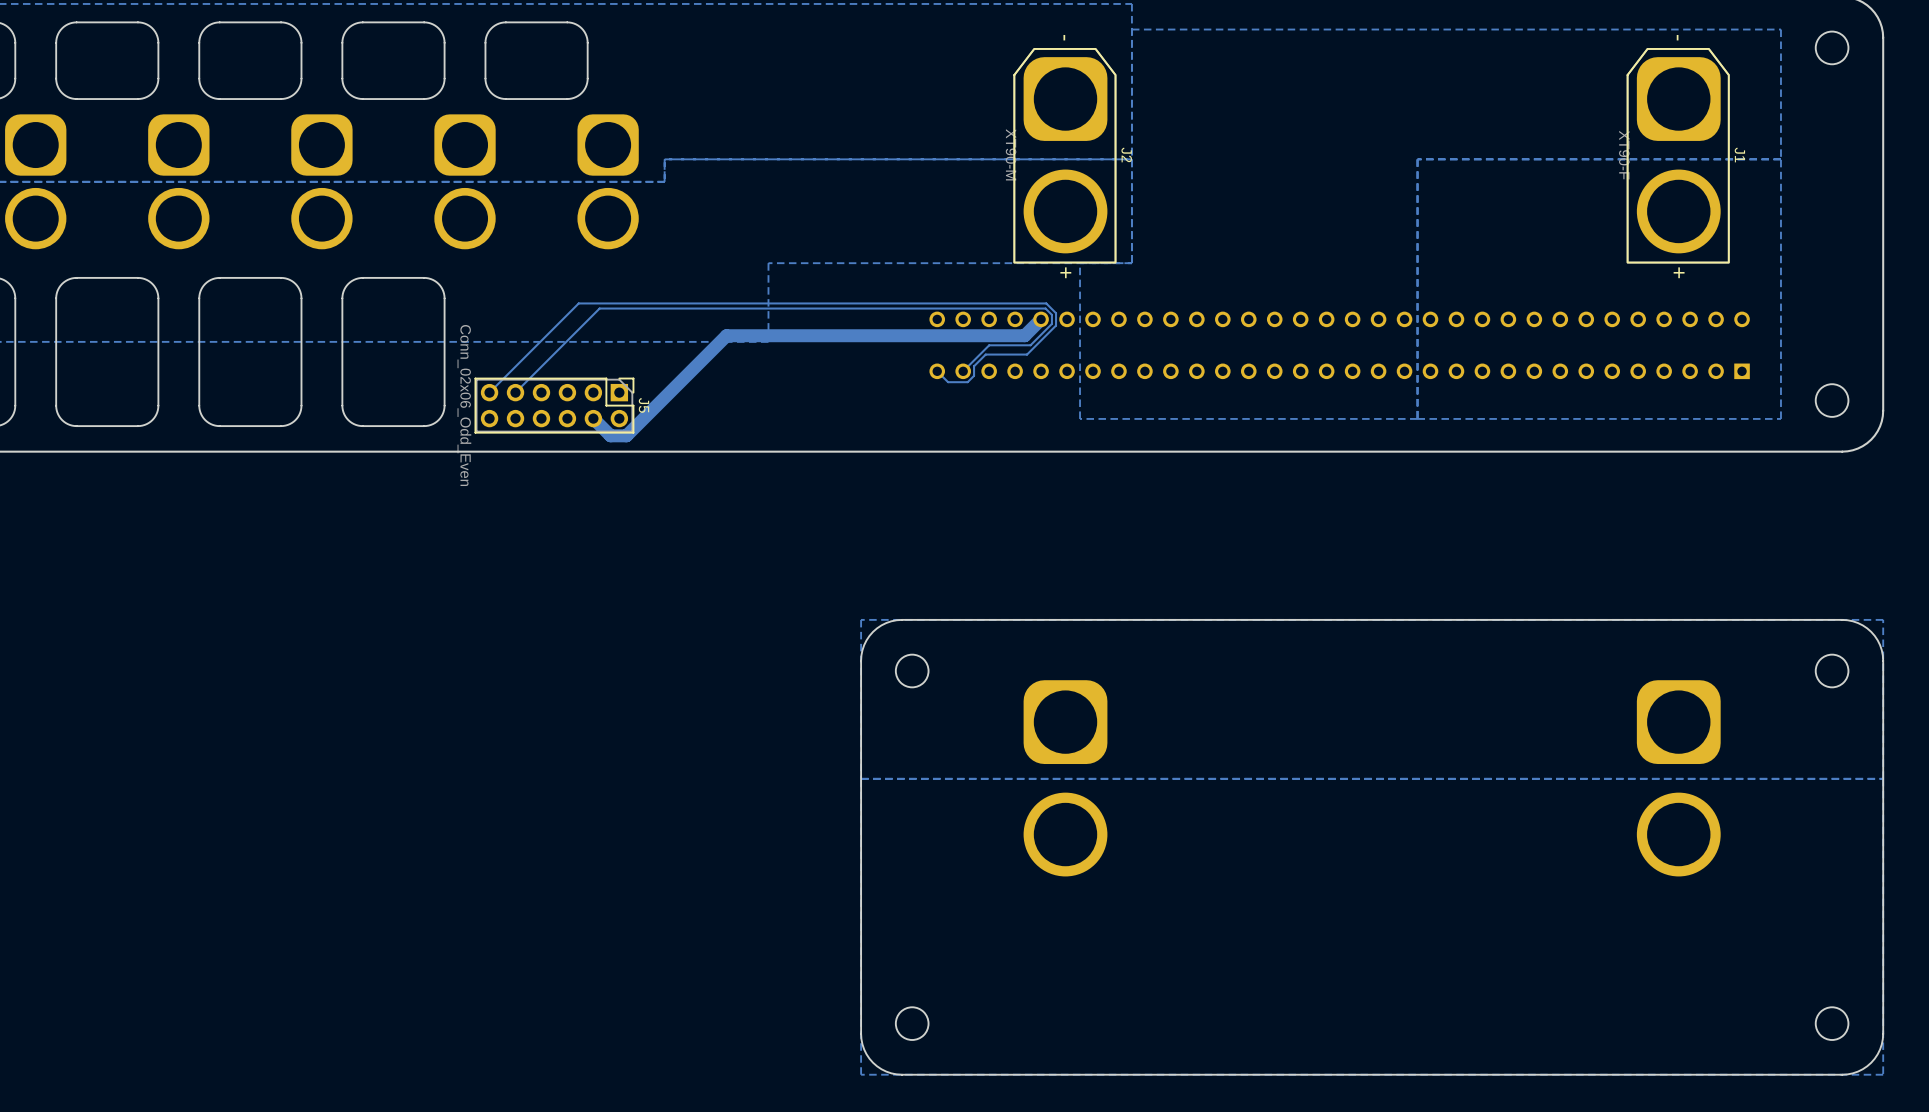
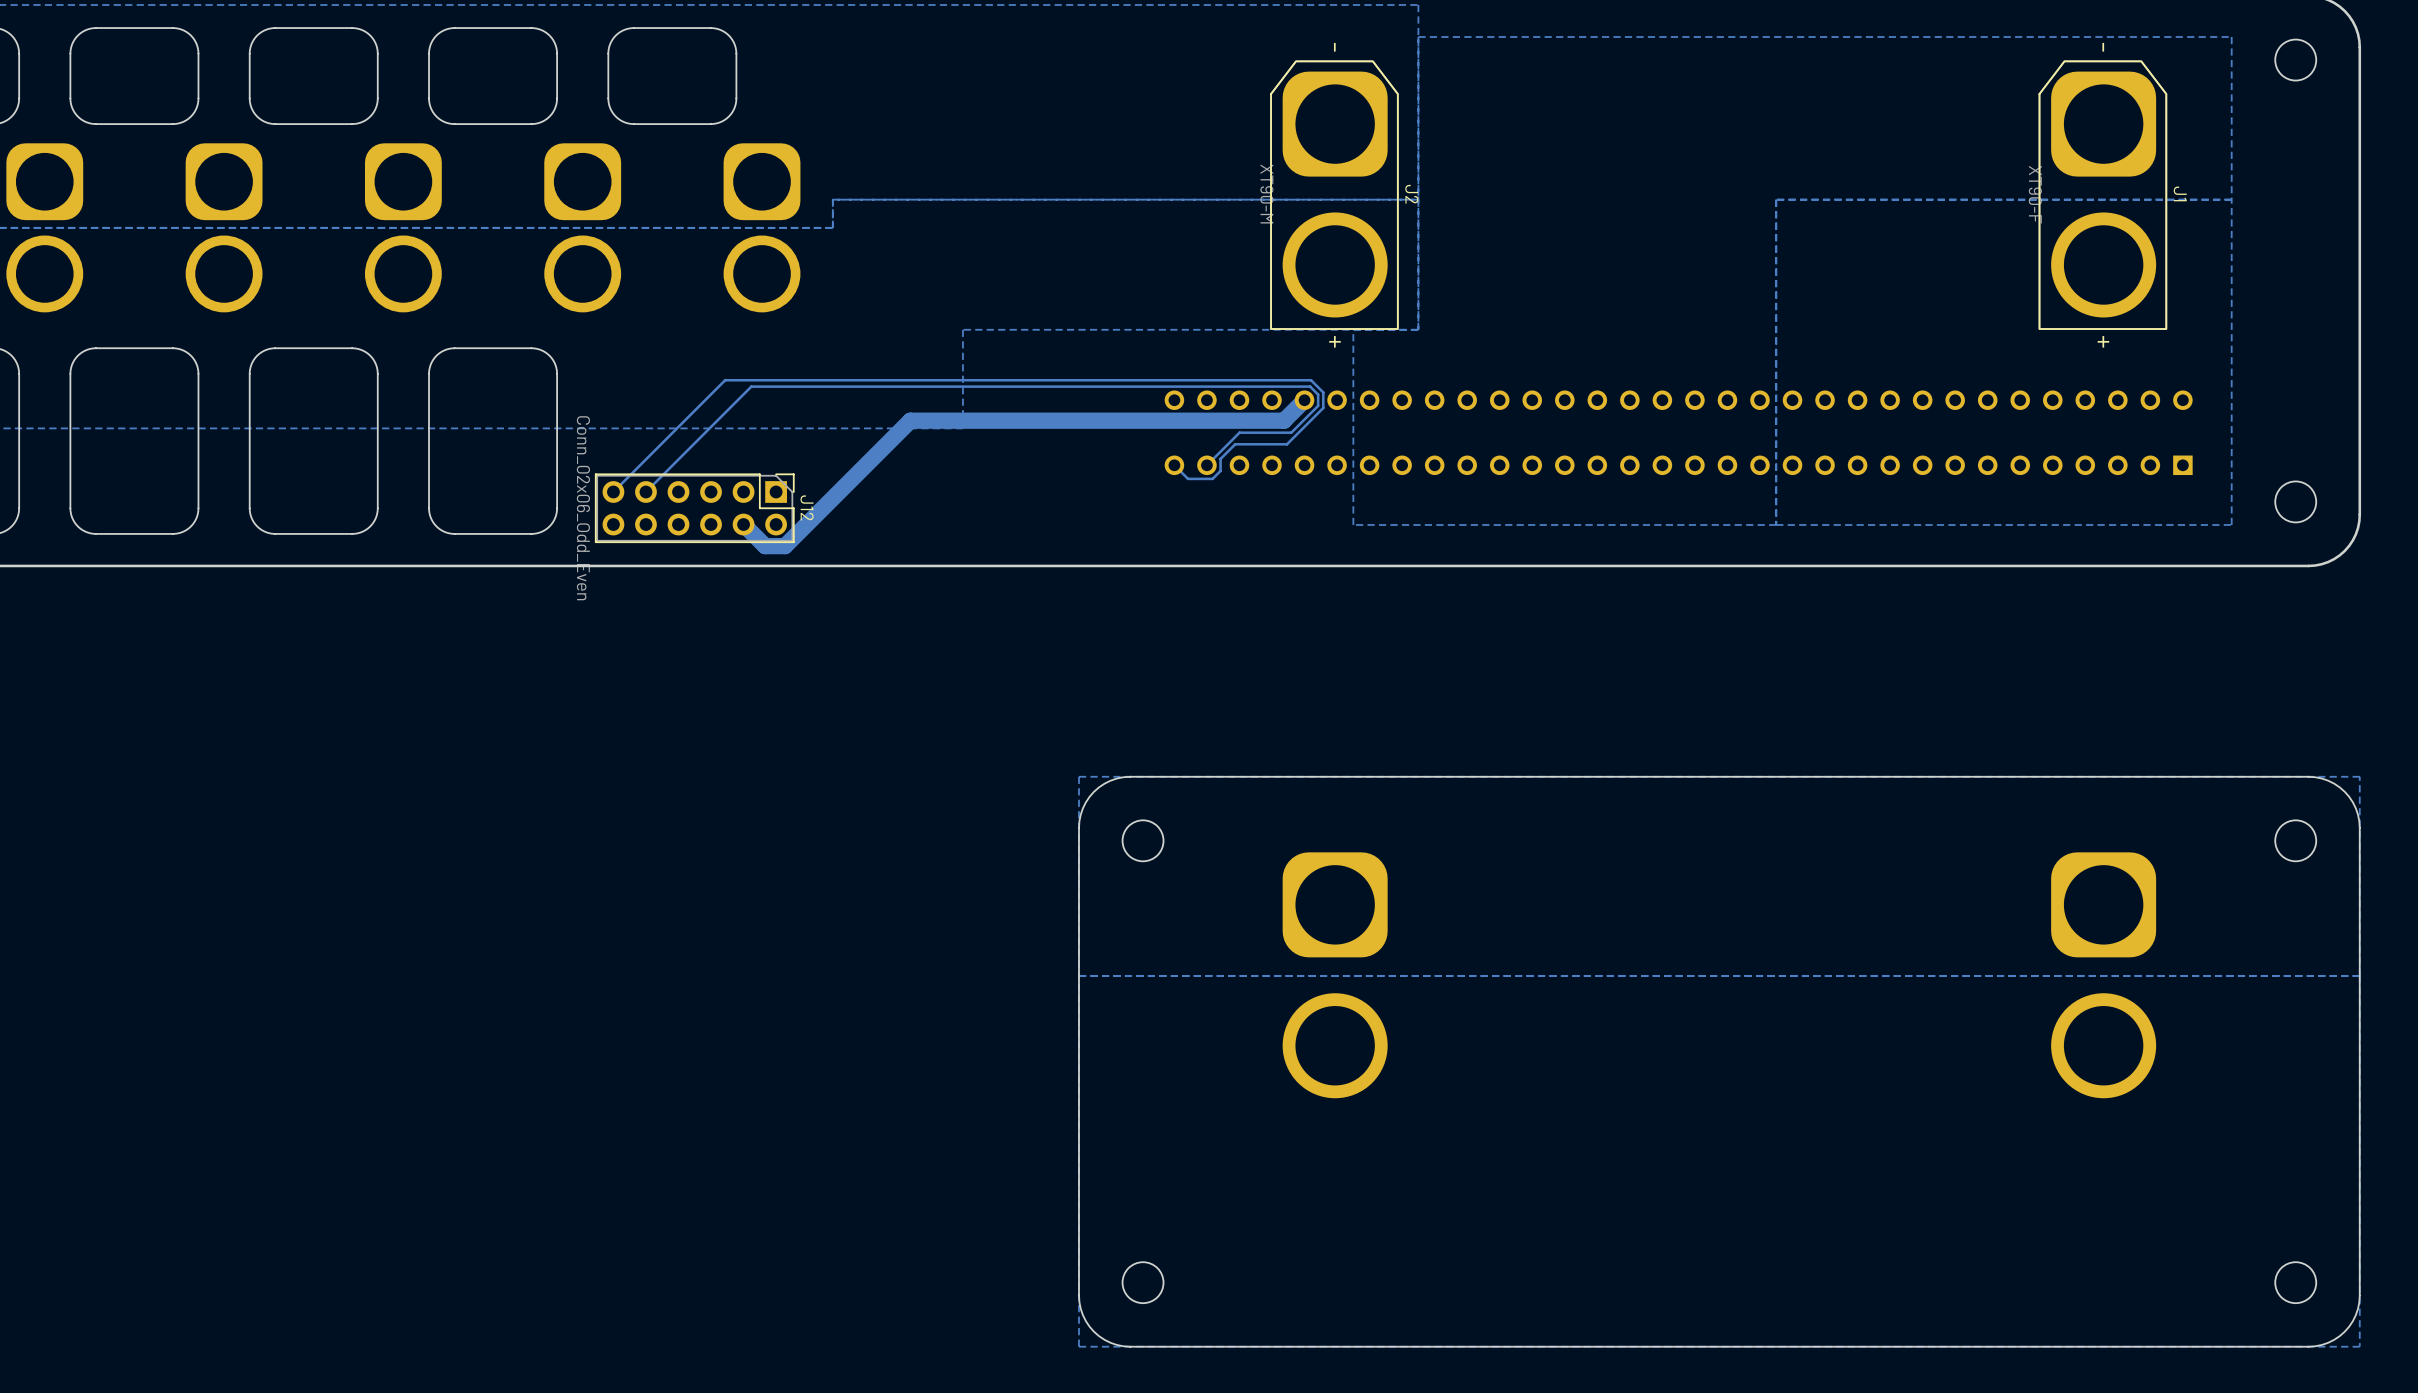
J5 name: J5 (643, 405) -> J12 (807, 507)

